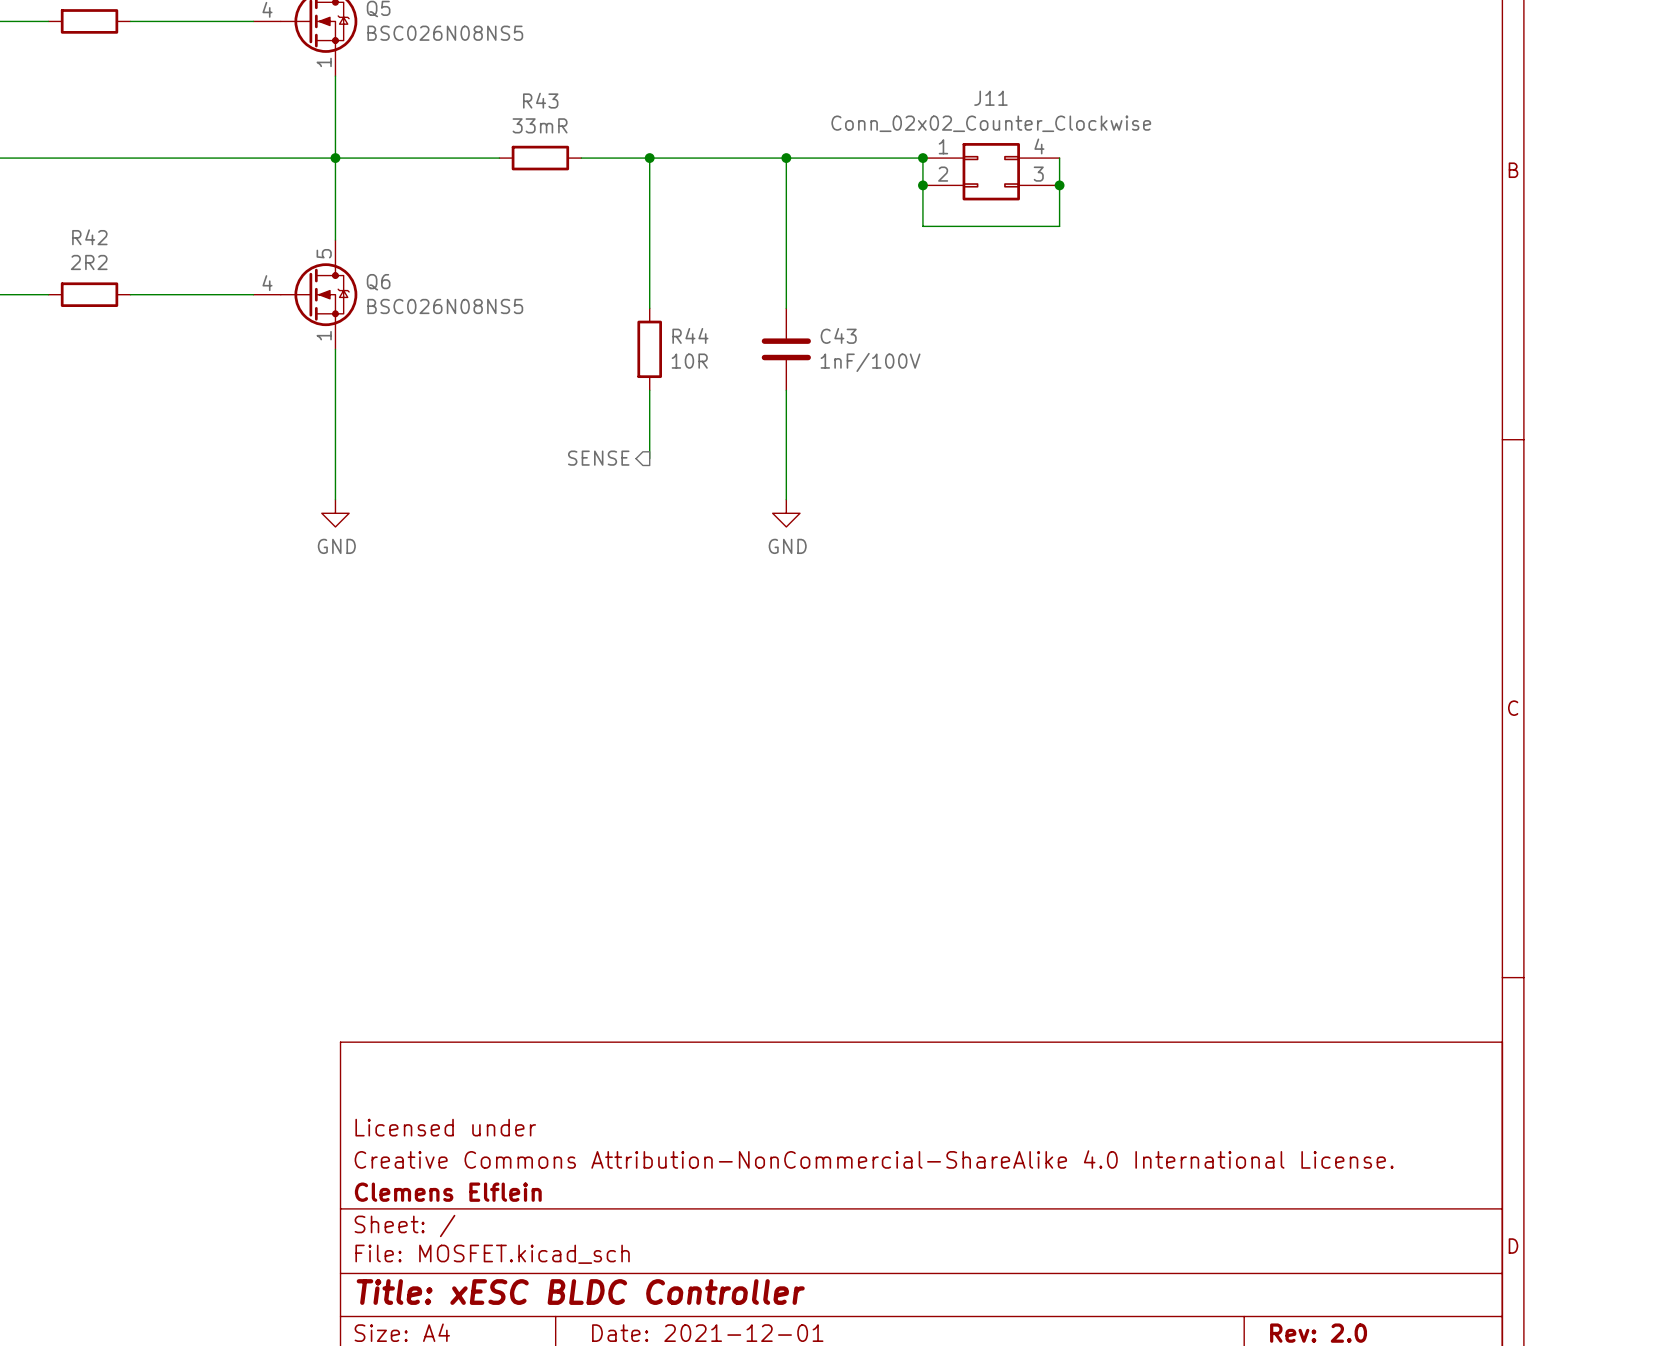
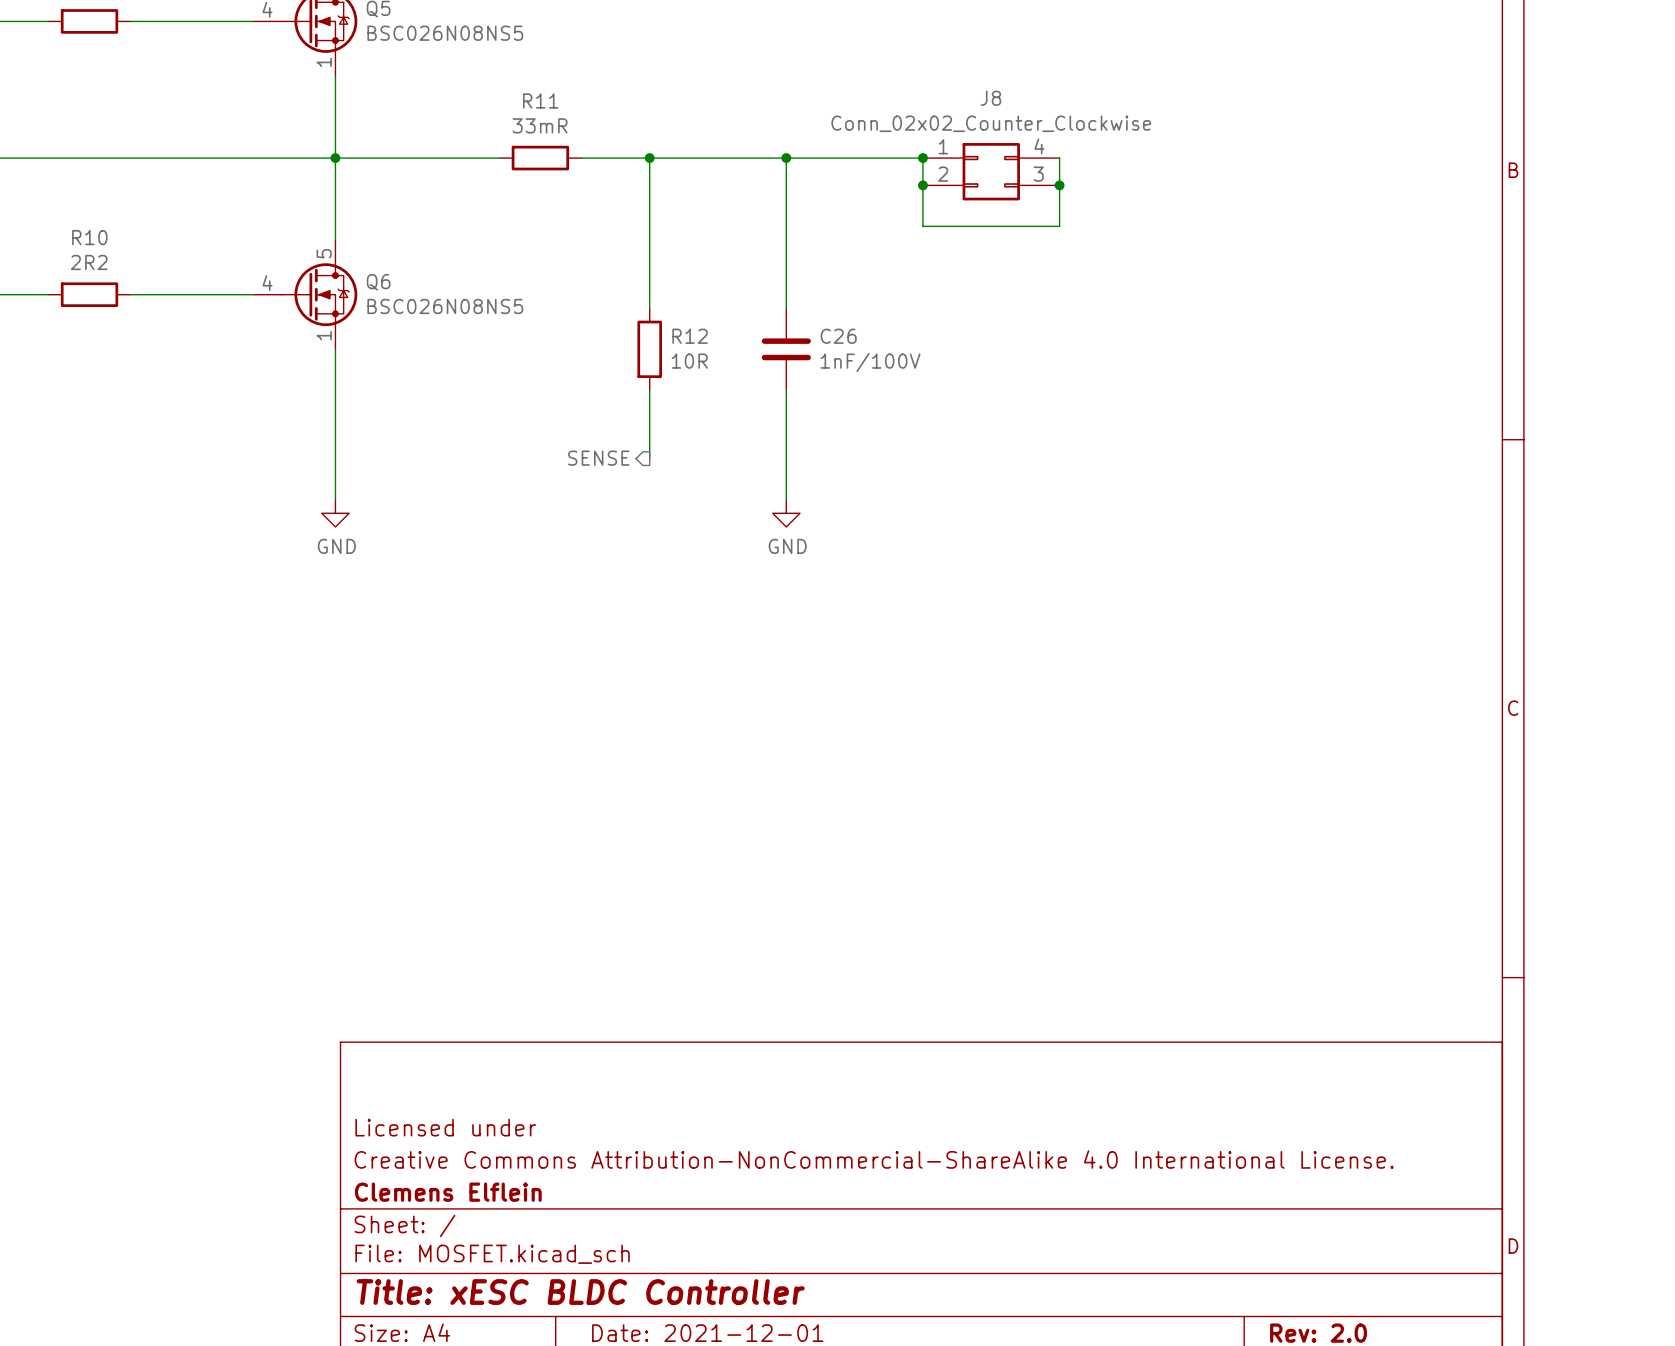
J11 name: J11 (990, 98) -> J8 (990, 98)
R43 name: R43 (540, 100) -> R11 (540, 100)
R42 name: R42 (89, 237) -> R10 (89, 237)
R44 name: R44 (690, 335) -> R12 (690, 336)
C43 name: C43 (838, 335) -> C26 (838, 336)

